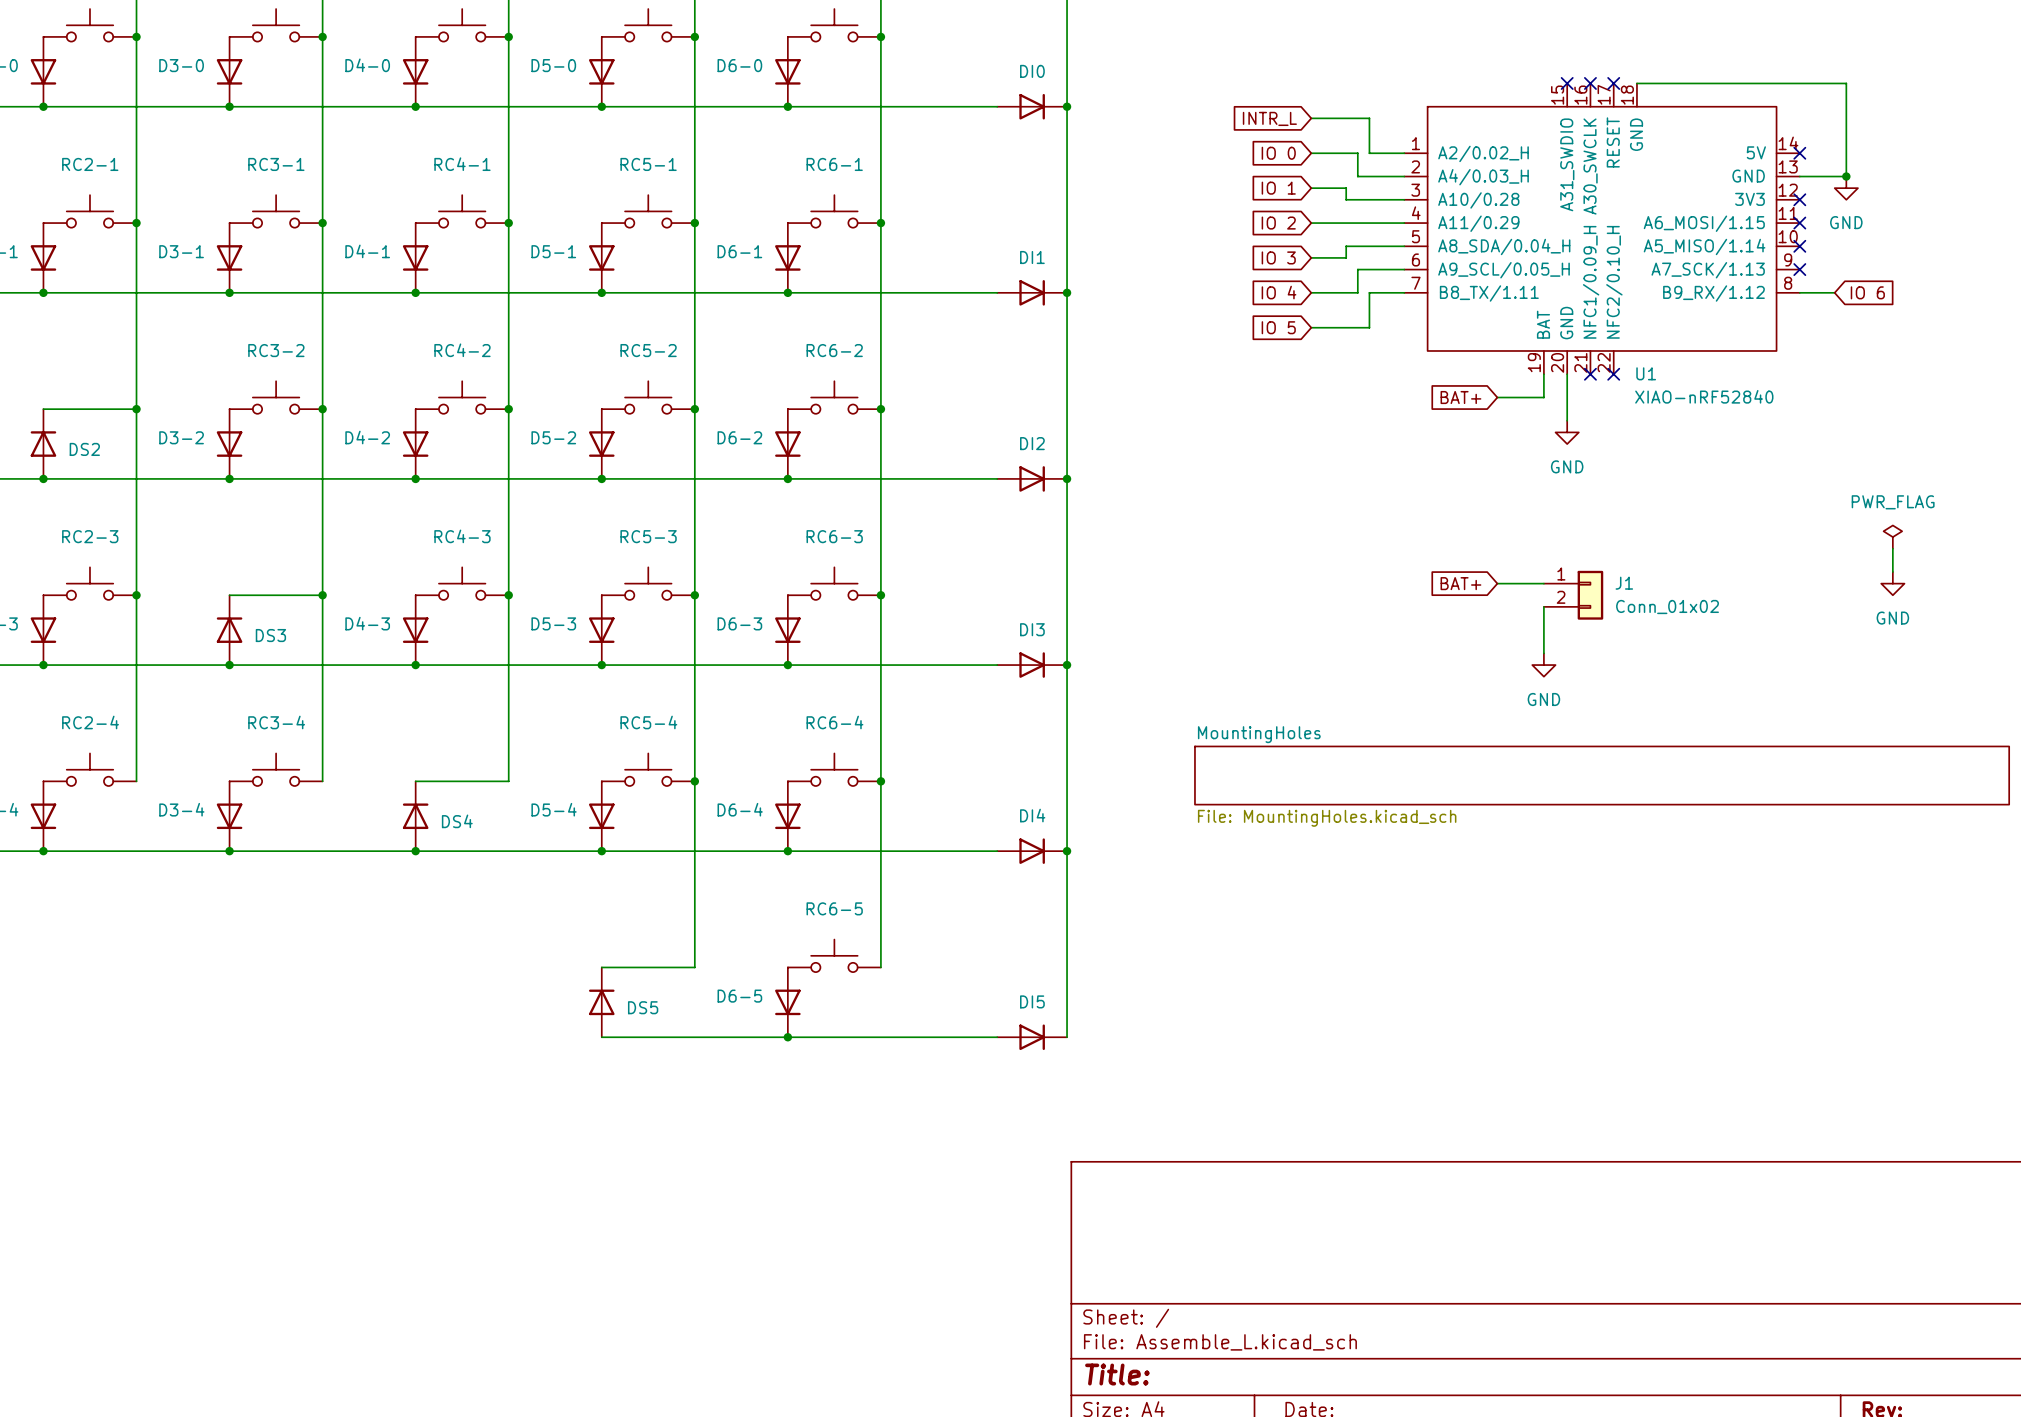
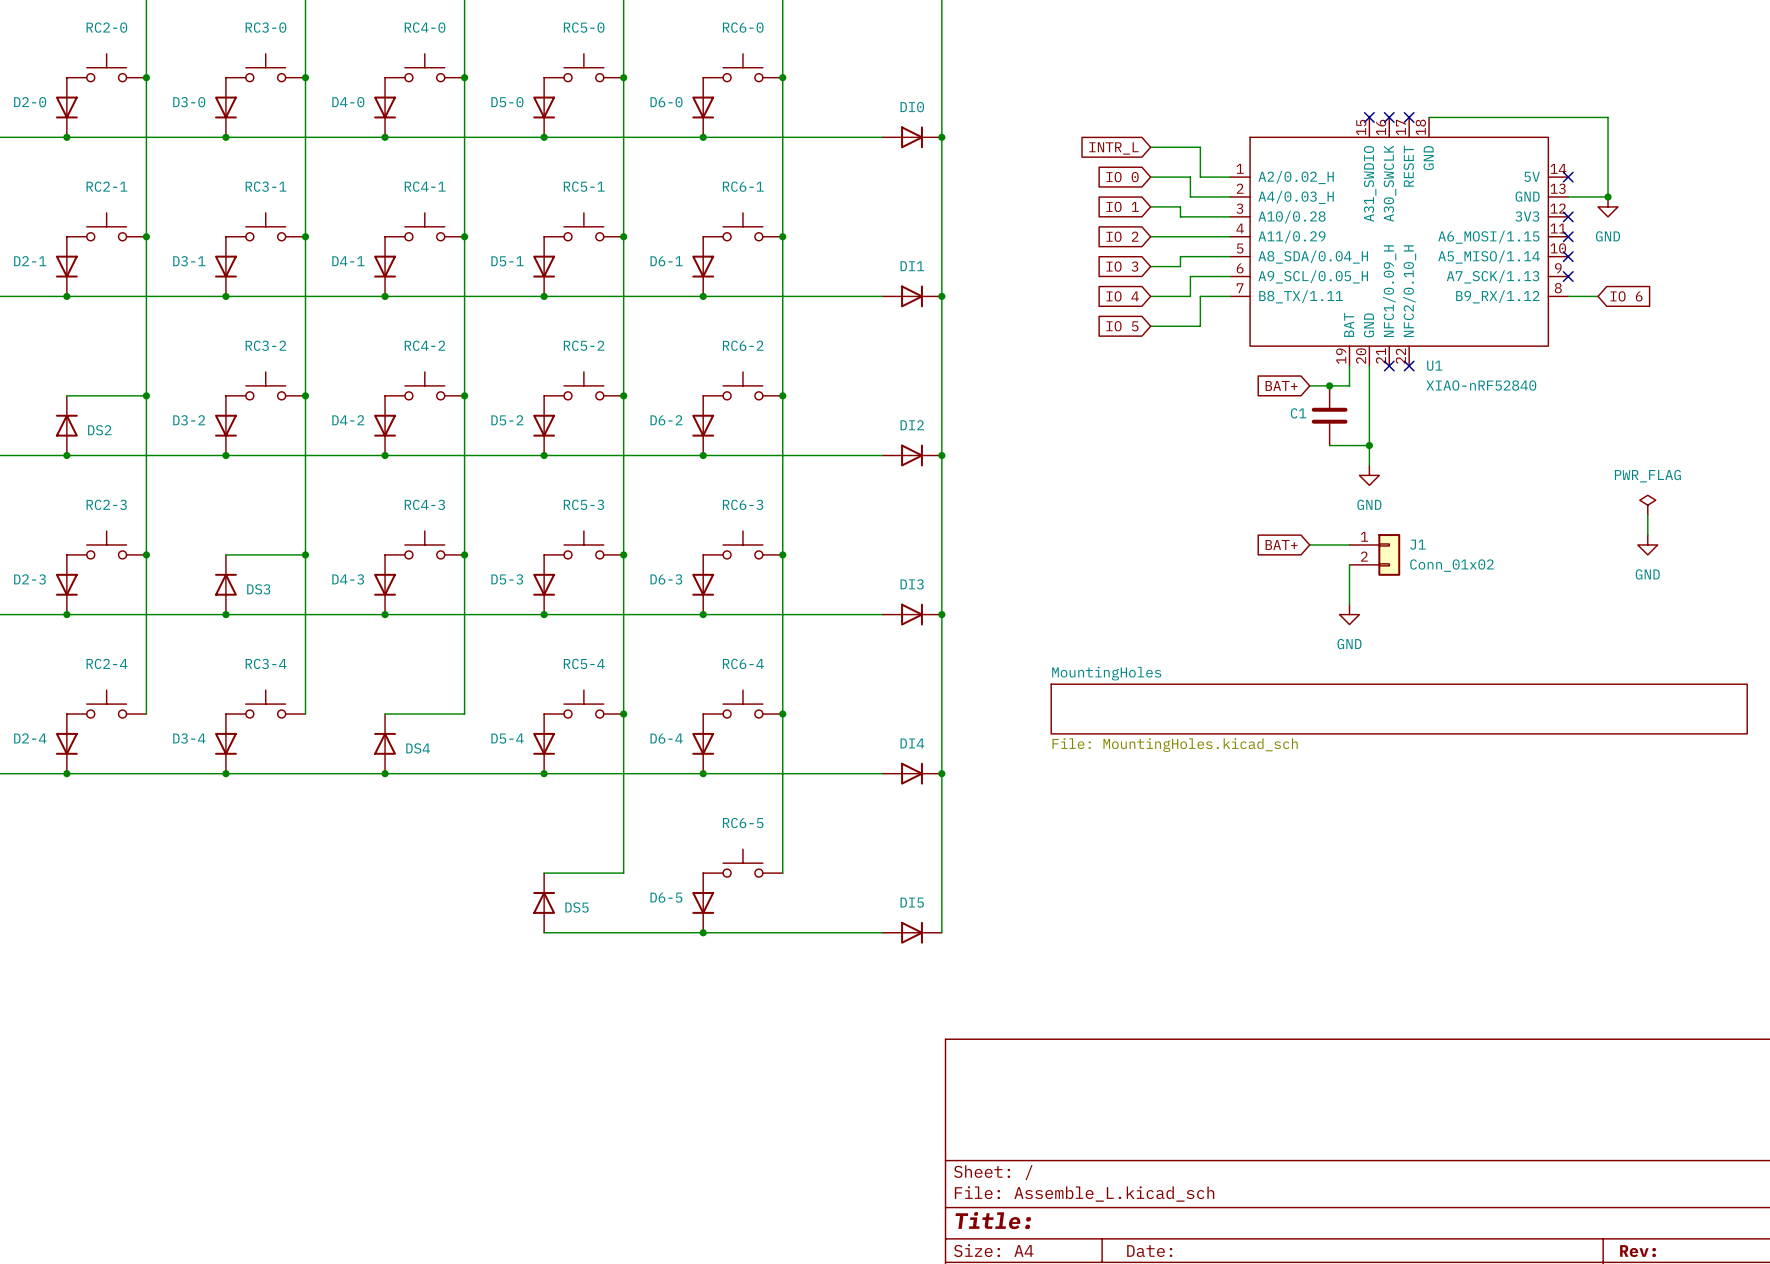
junction: none -> (1329, 385)
wire: none -> (1369, 405) (1369, 465)
C1: none -> (1329, 415)
power symbol position: GND (1567, 432) -> GND (1369, 475)
wire: none -> (1329, 445) (1369, 445)
junction: none -> (1369, 445)

